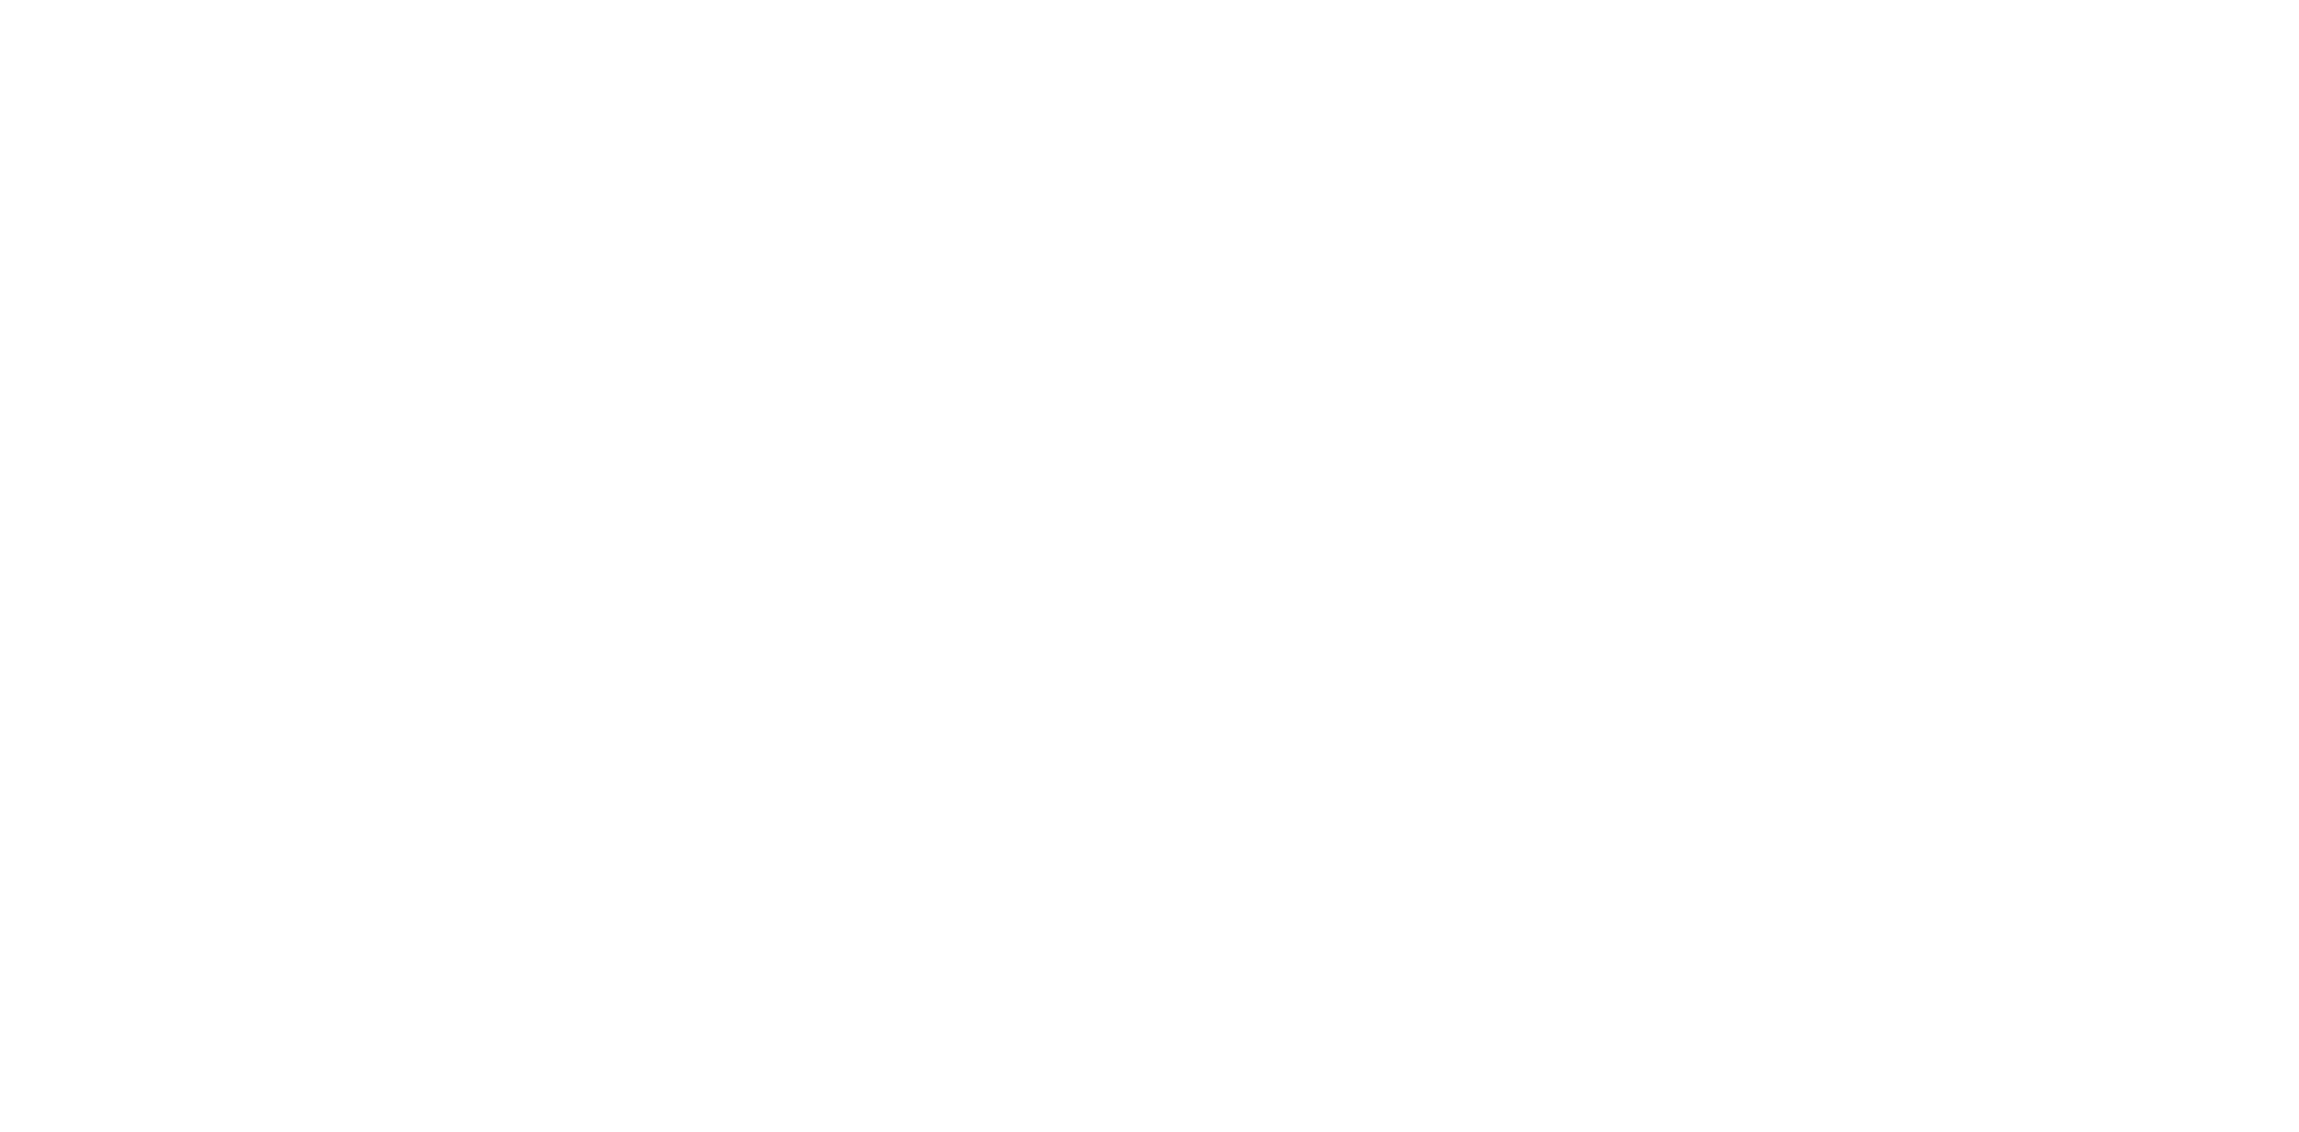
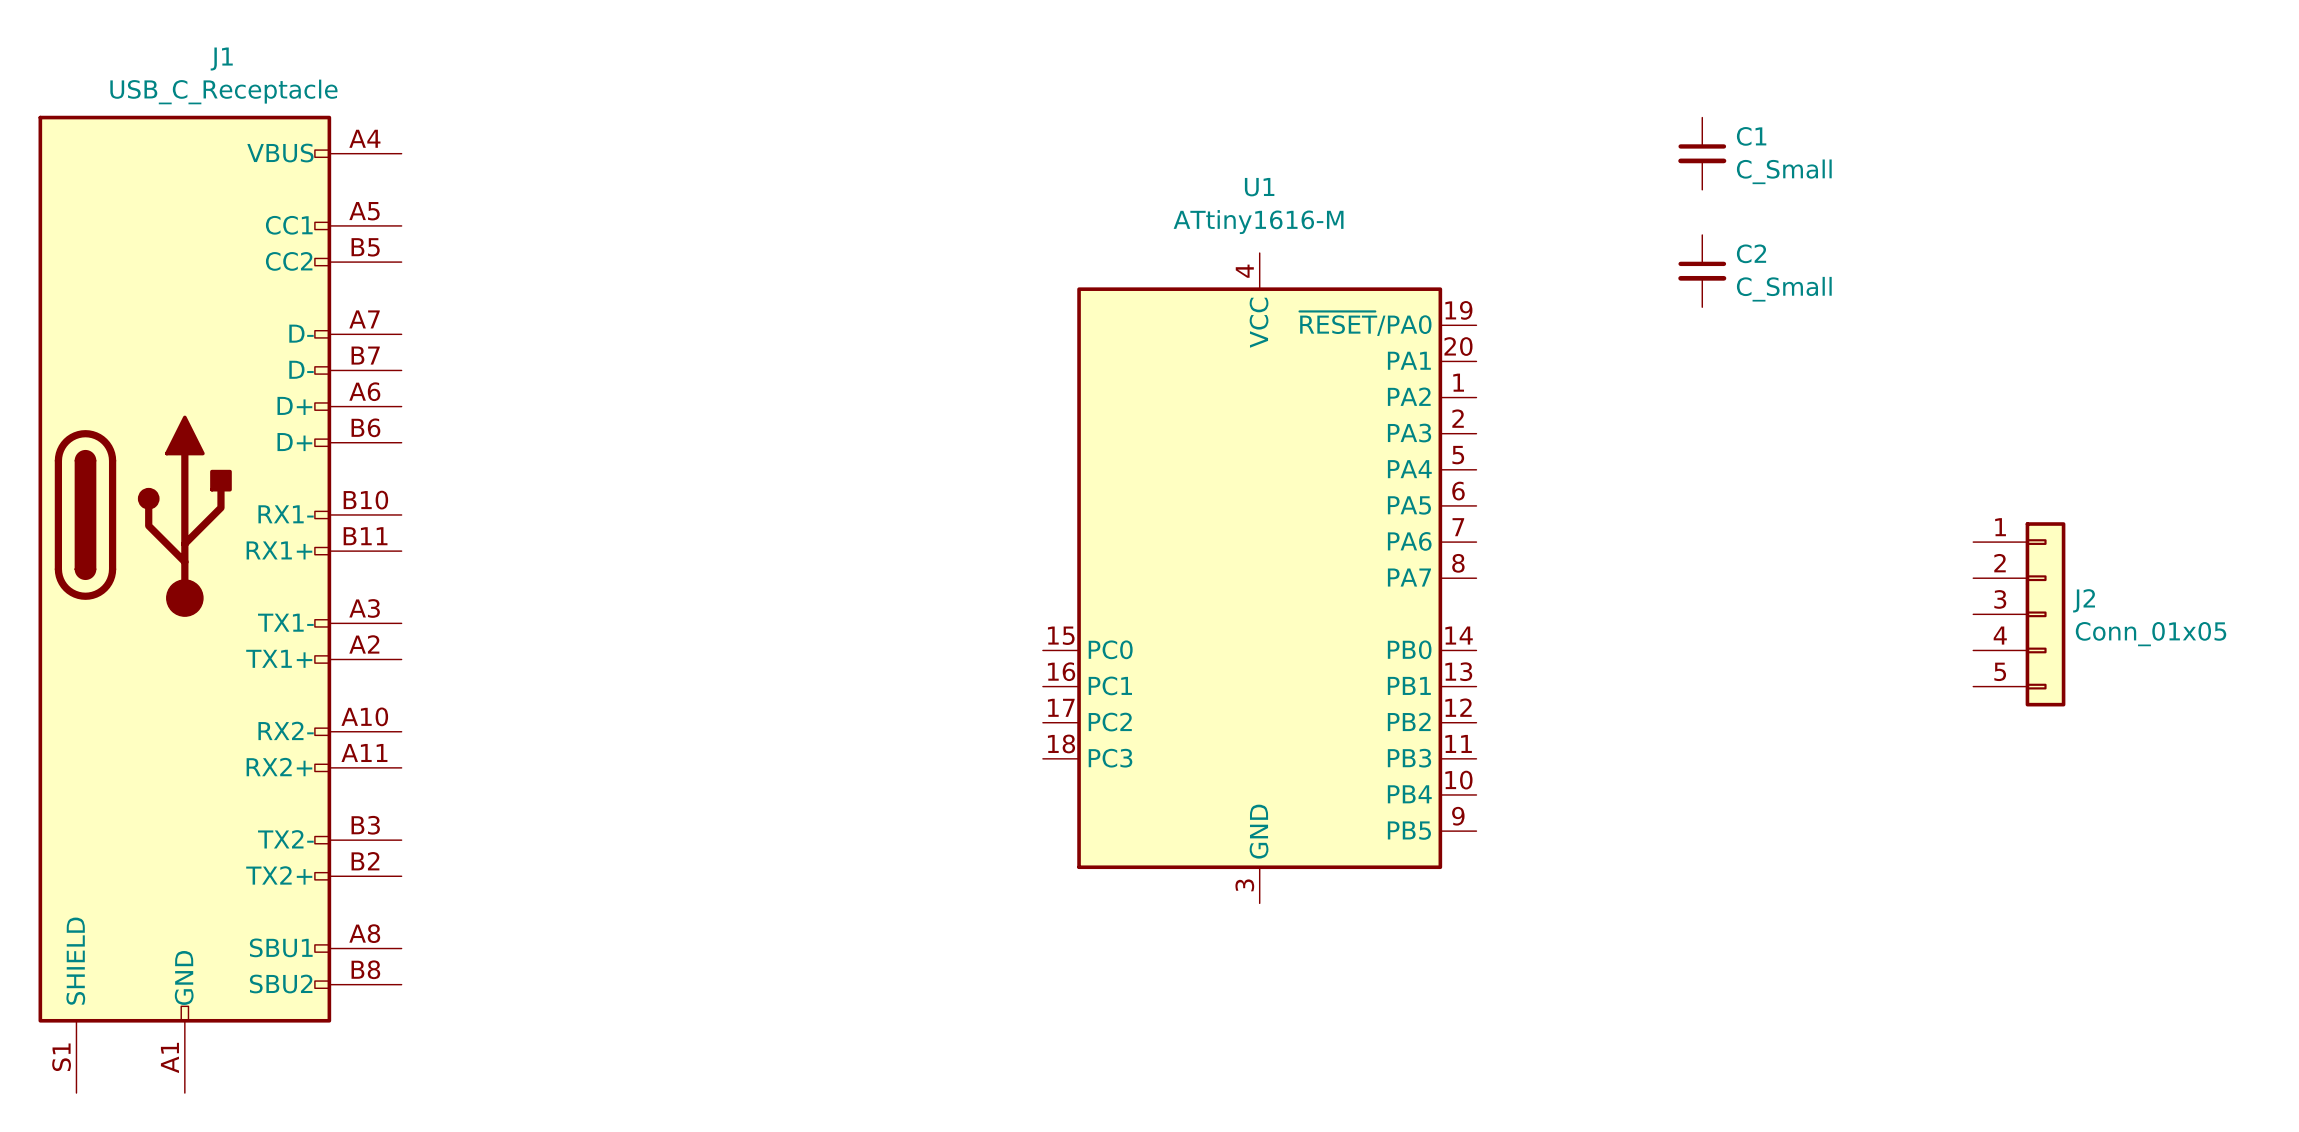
C1: none -> C_Small (1702, 153)
C2: none -> C_Small (1702, 271)
U1: none -> ATtiny1616-M (1259, 578)
J1: none -> USB_C_Receptacle (220, 604)
J2: none -> Conn_01x05 (2019, 614)

